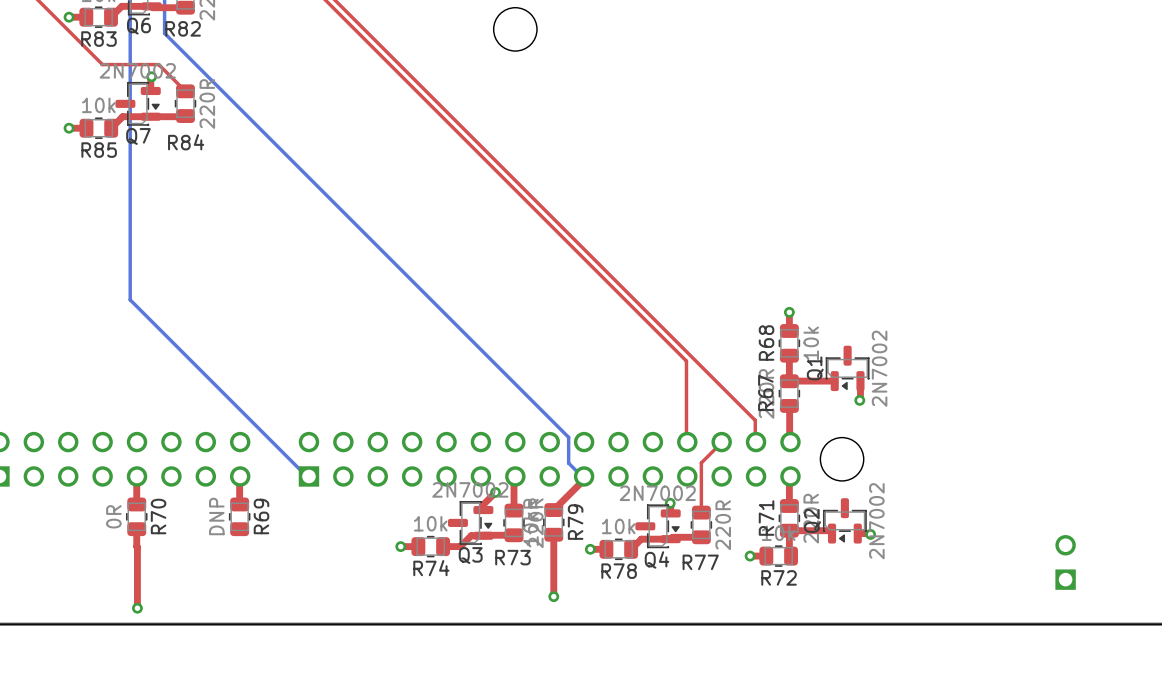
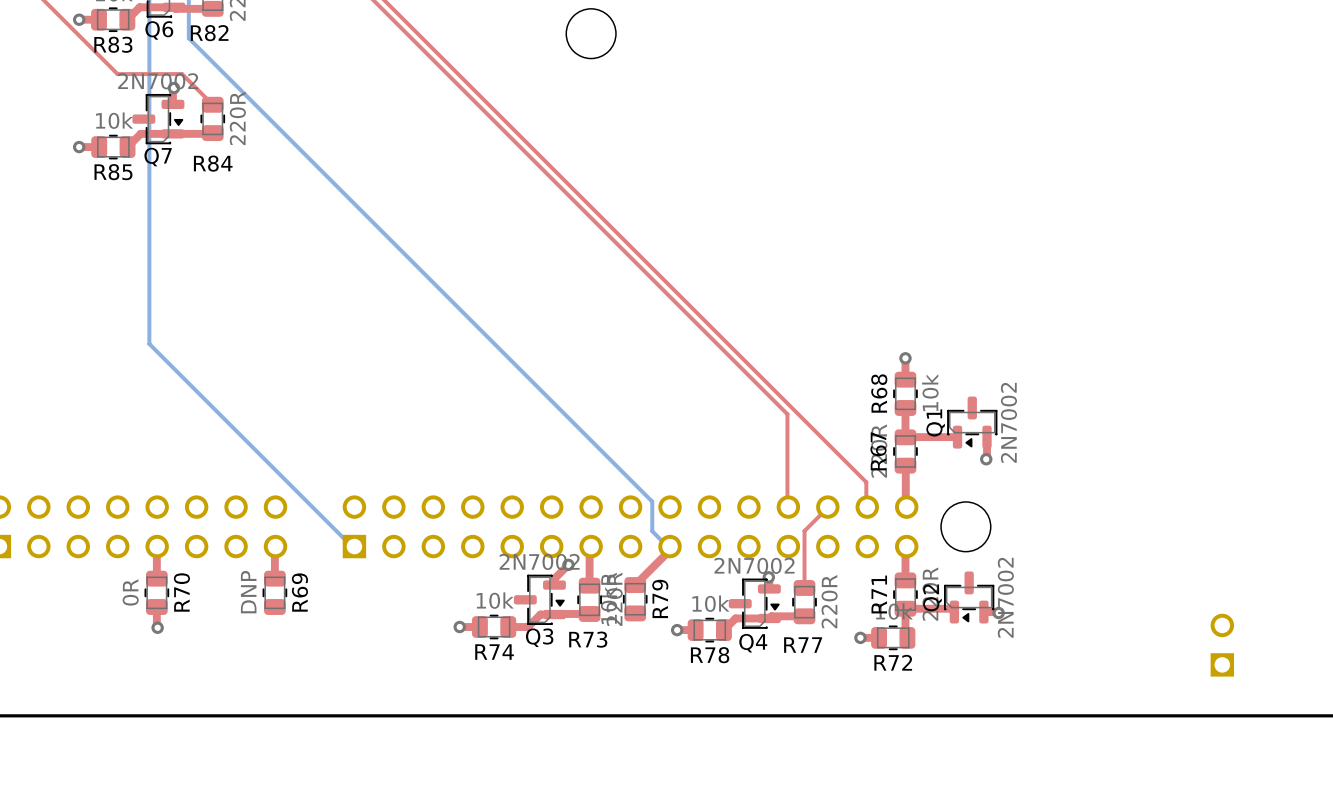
top track: (553, 534) (553, 596) -> none
top track: (137, 547) (137, 608) -> none
via: (553, 596) -> none
via position: (137, 608) -> (157, 627)

